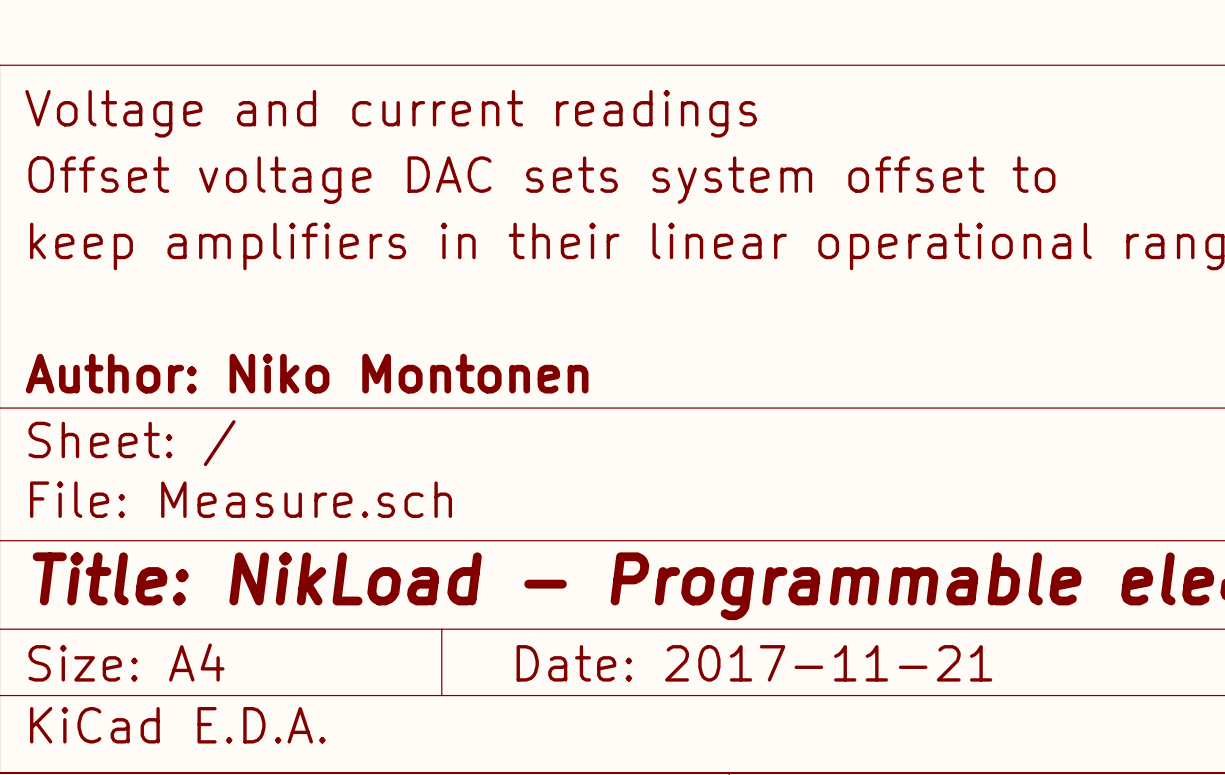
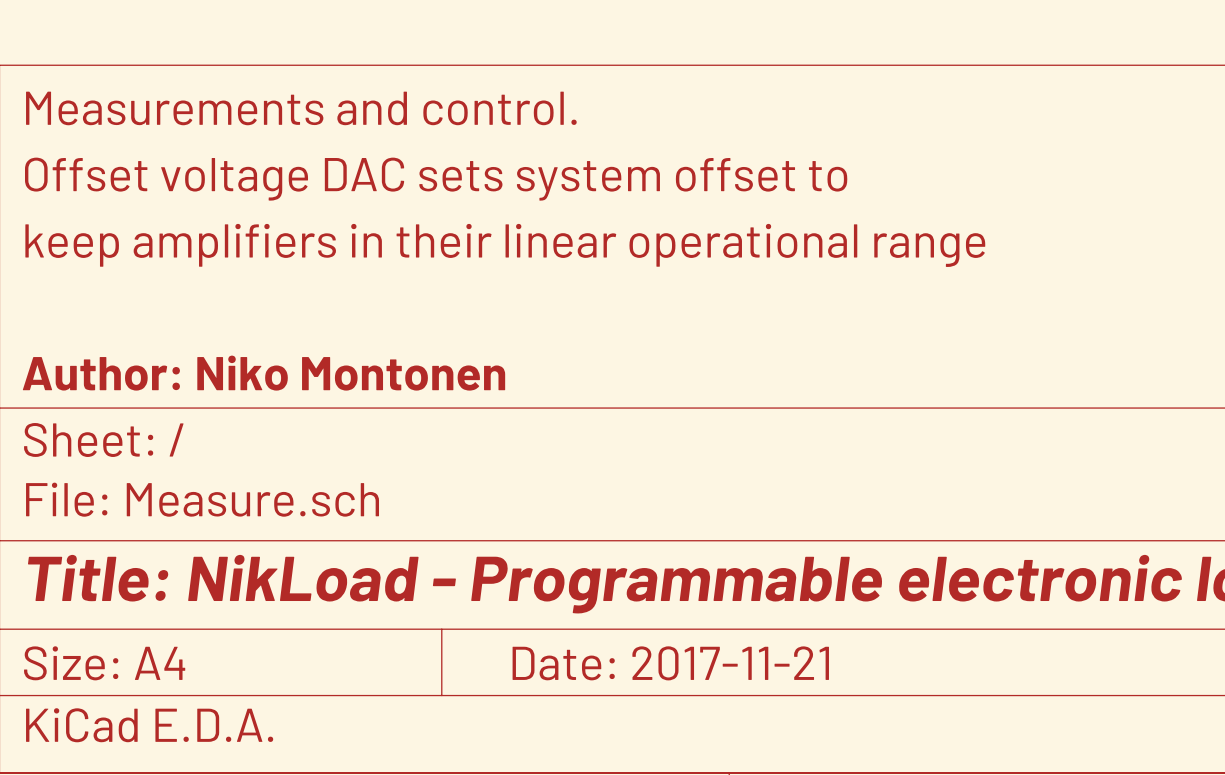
title block: Voltage and current readings (391, 113) -> Measurements and control. (301, 108)

